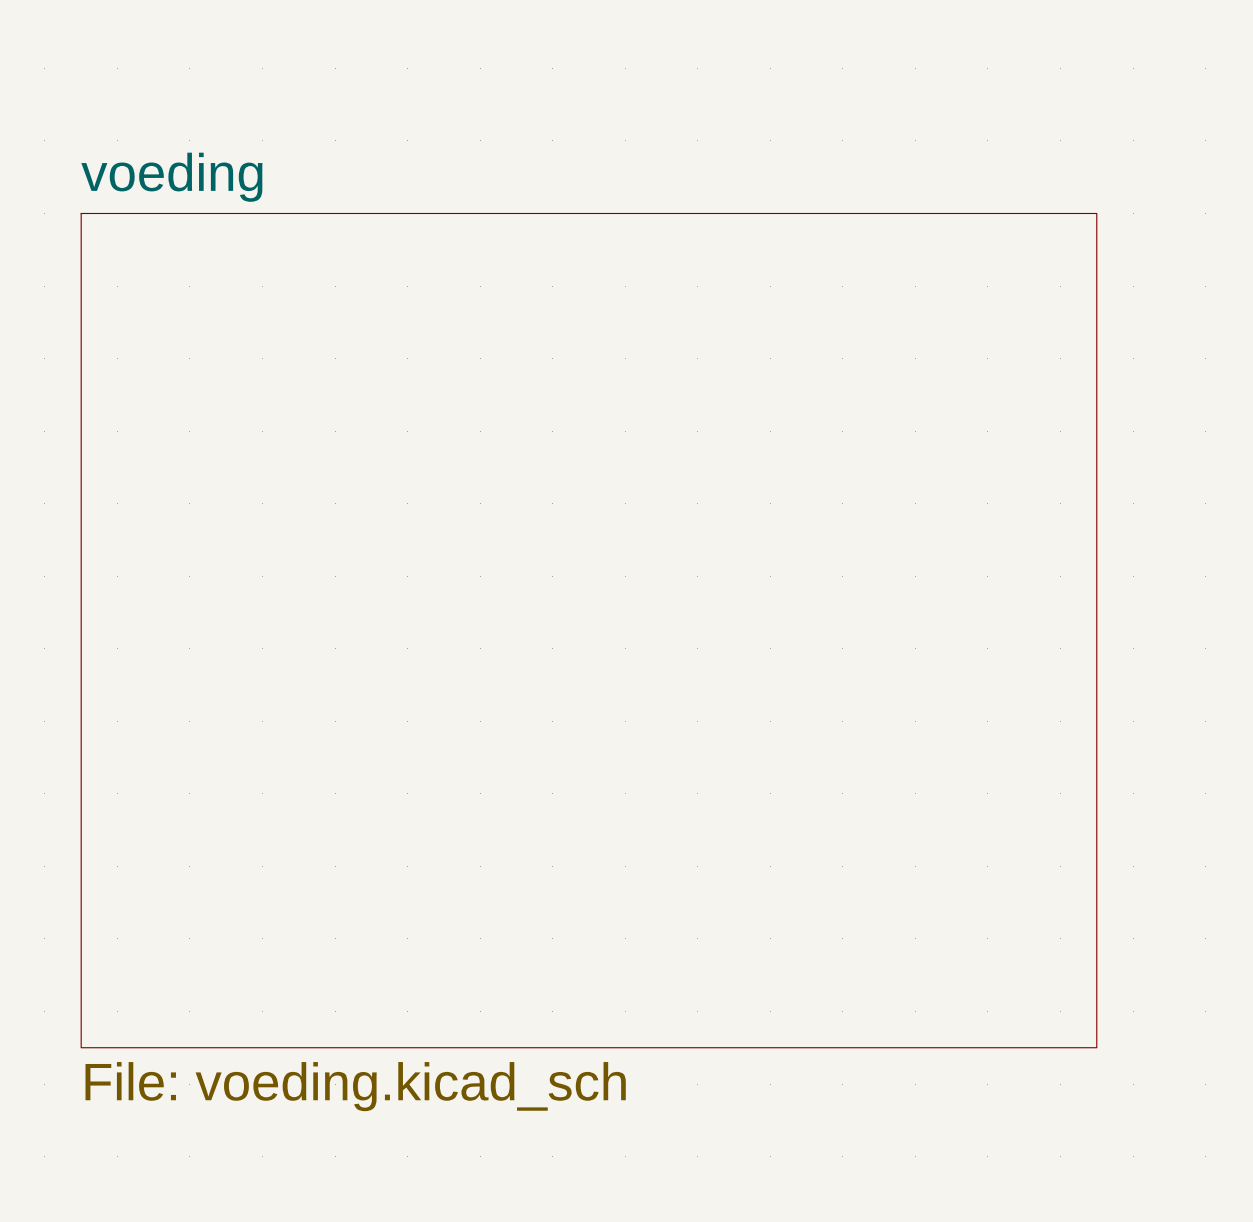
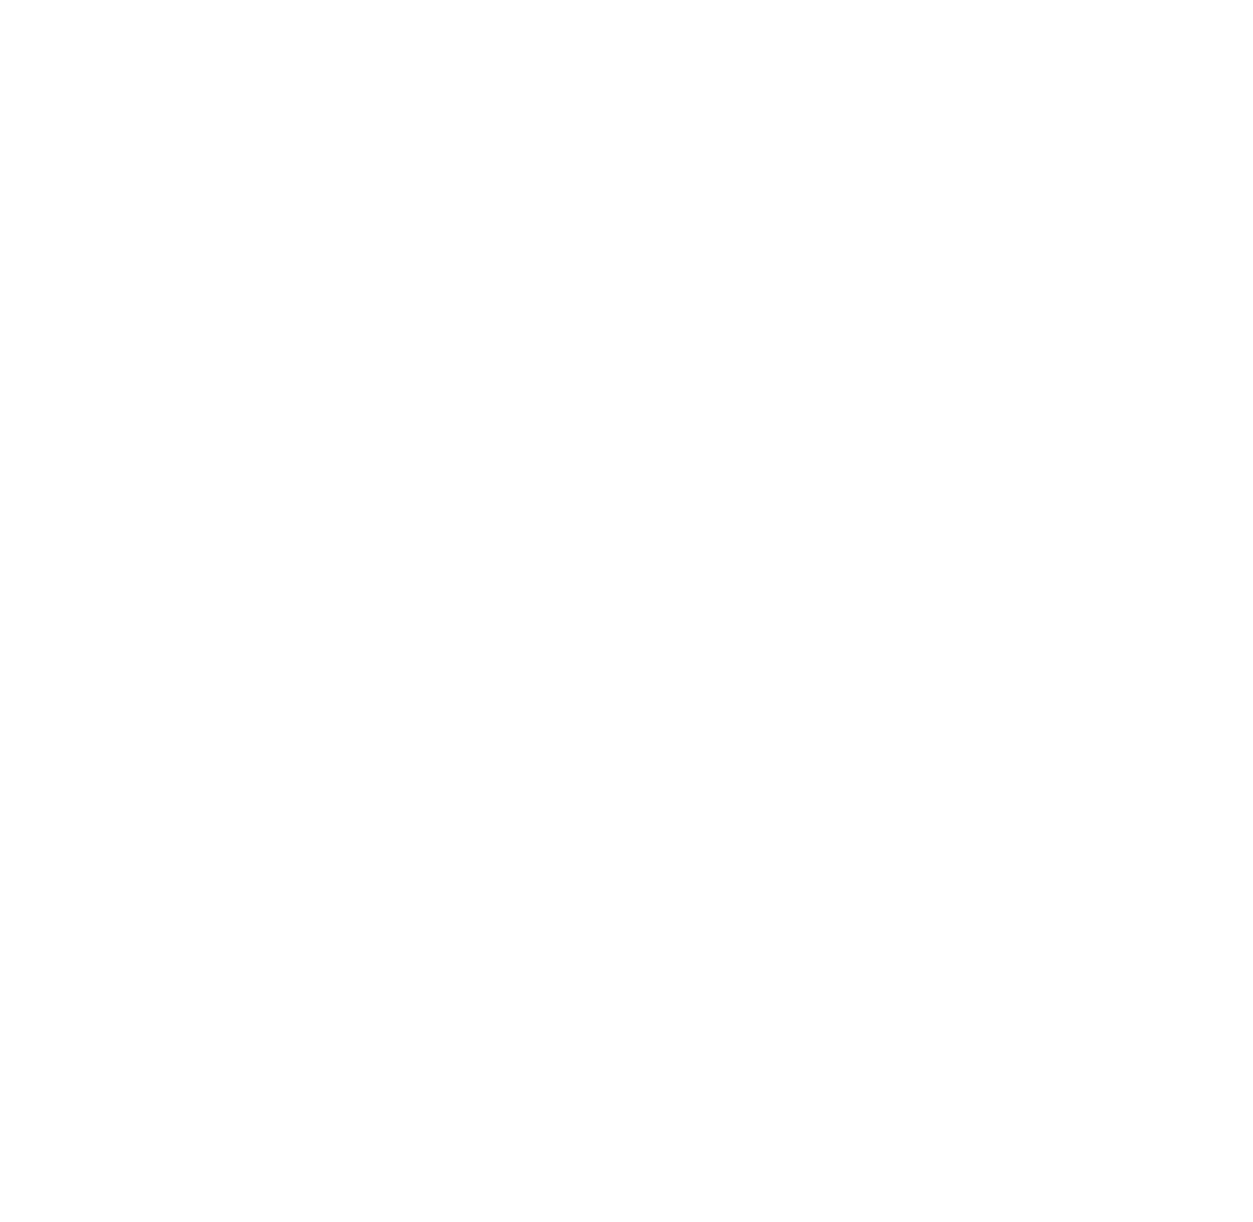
sheet voeding: File: voeding.kicad_sch (588, 630) -> none

